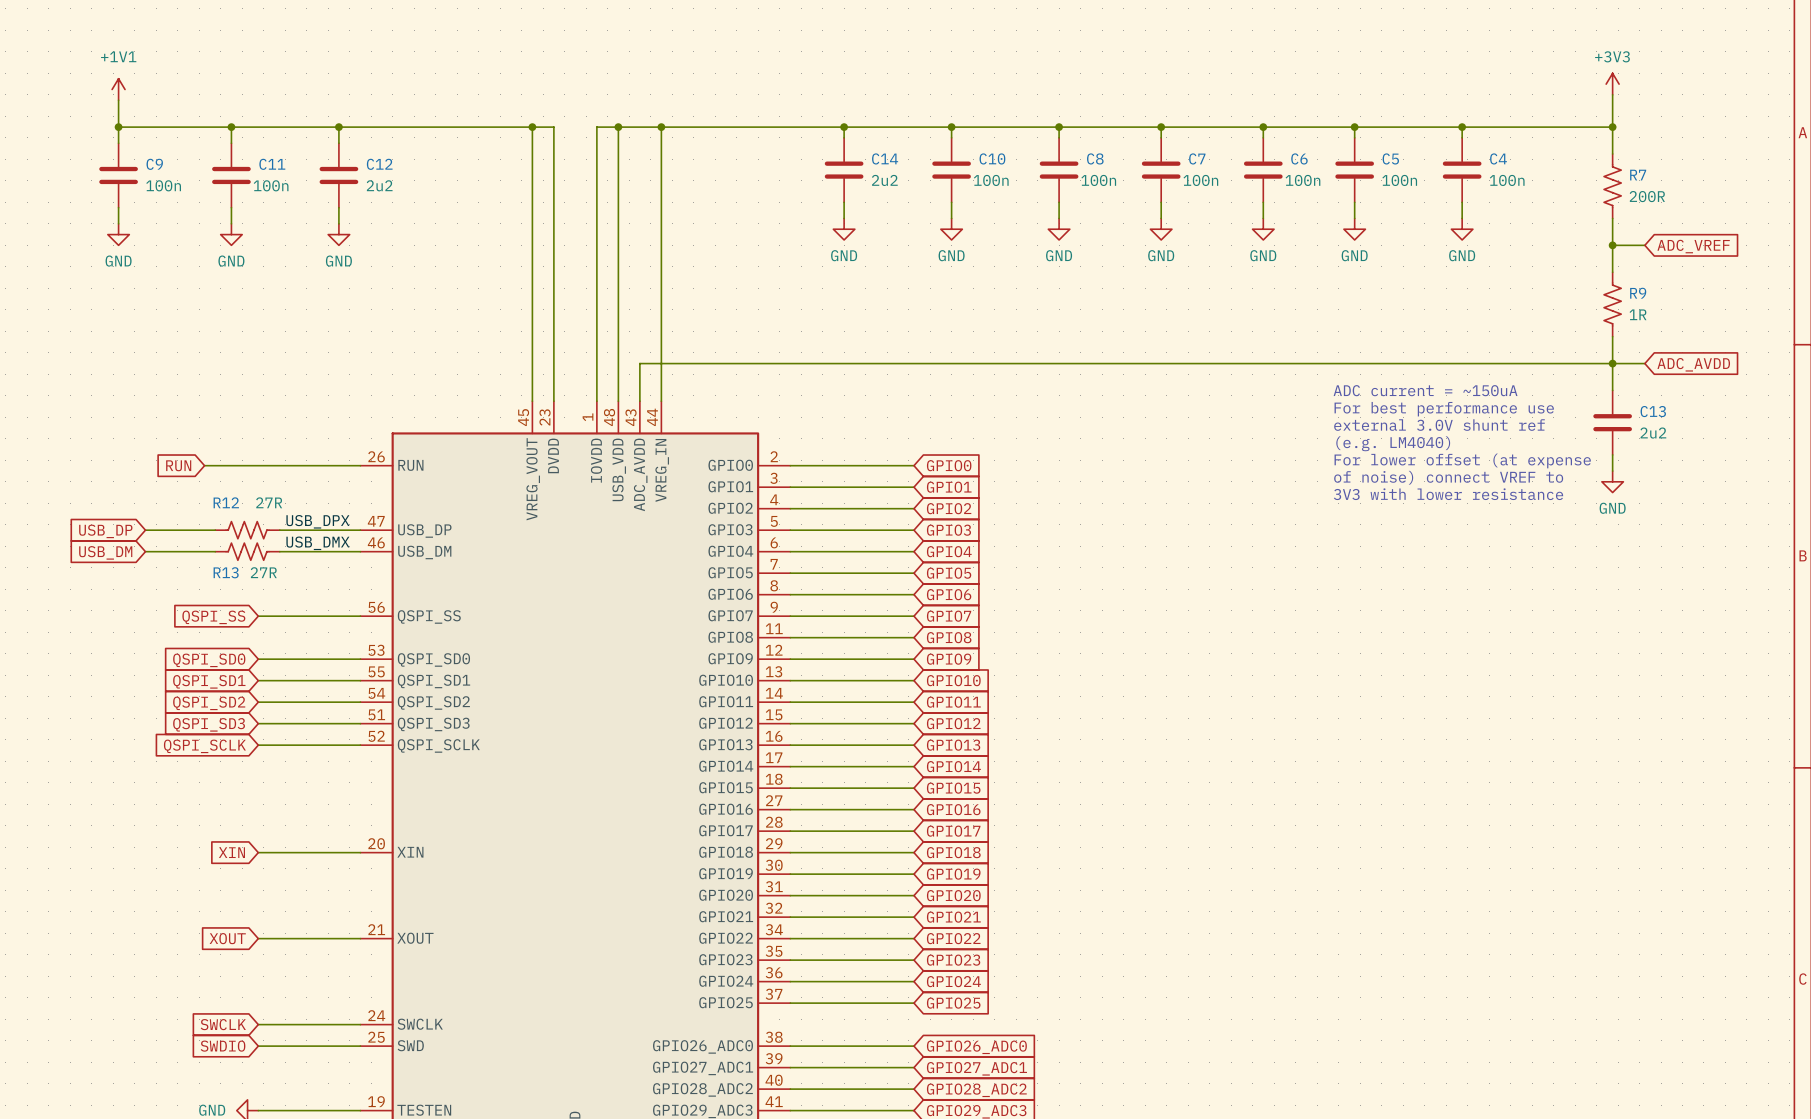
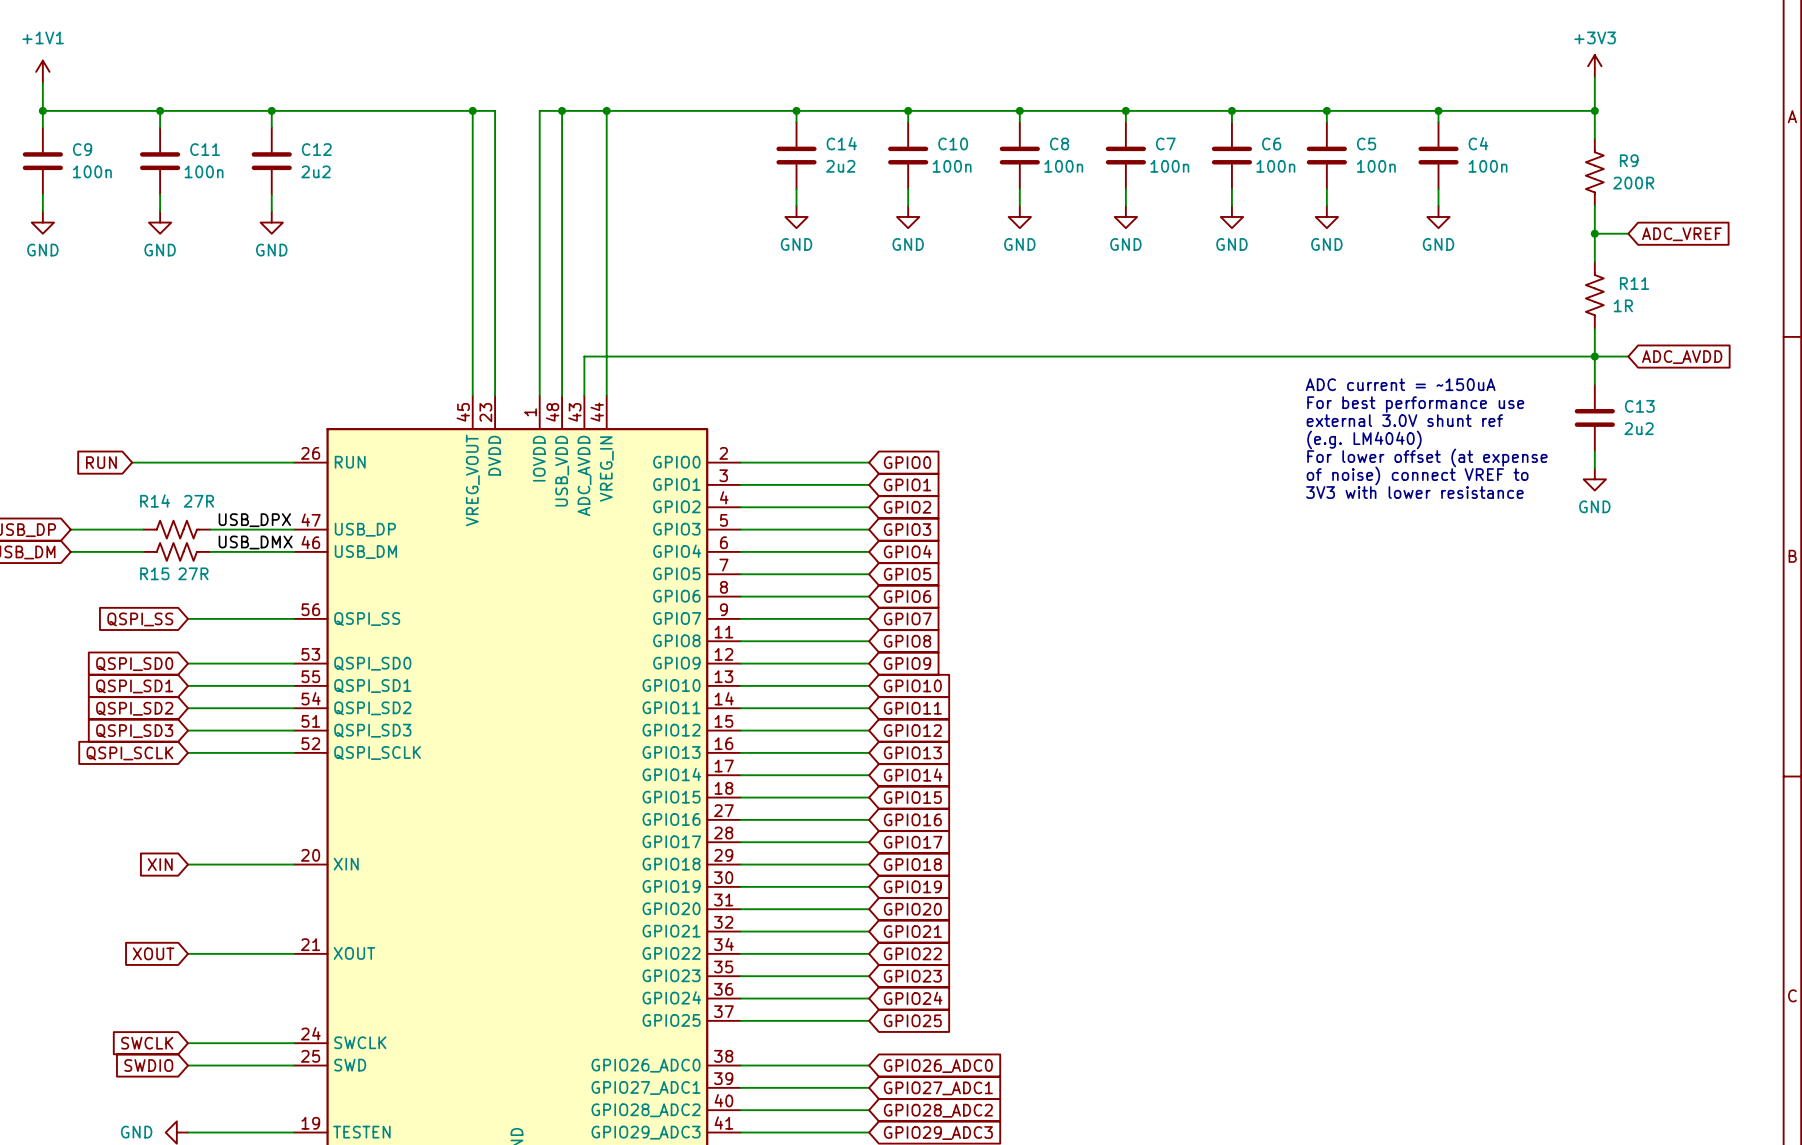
R7 name: R7 (1638, 175) -> R9 (1629, 160)
R9 name: R9 (1638, 293) -> R11 (1634, 283)
R12 name: R12 (226, 502) -> R14 (155, 501)
R13 name: R13 (226, 572) -> R15 (154, 573)

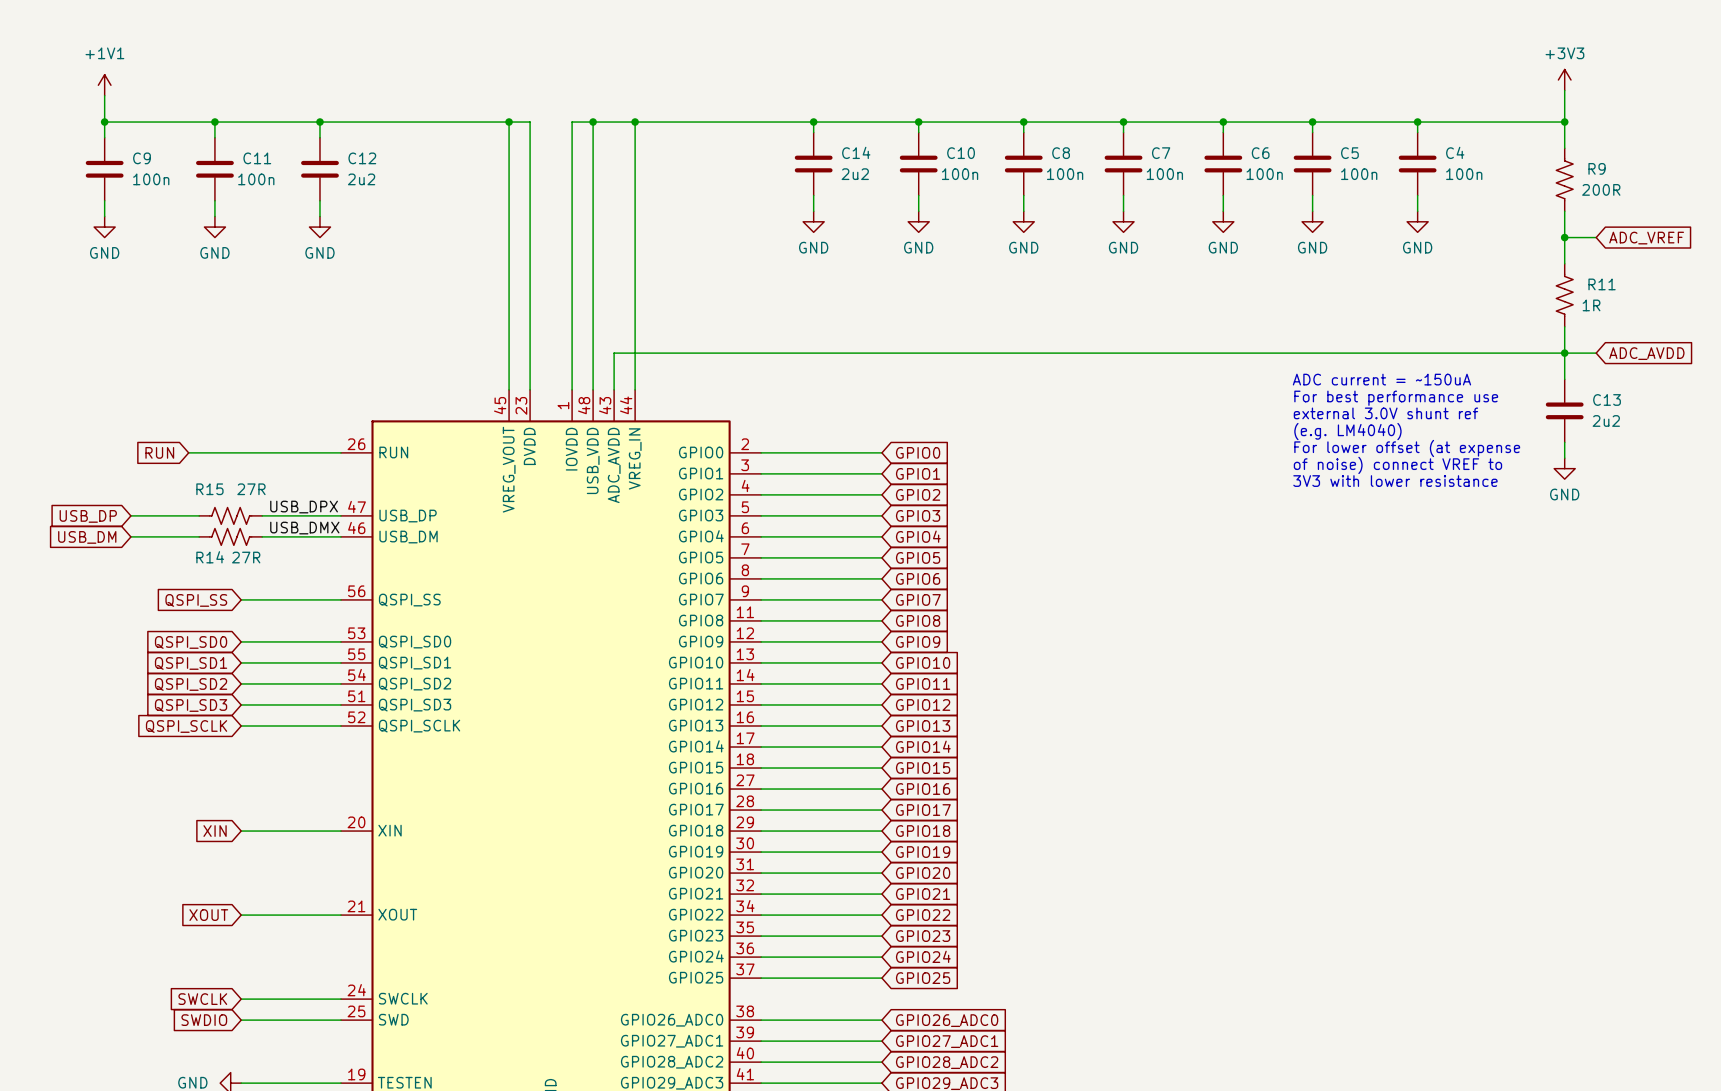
R14 name: R14 (155, 501) -> R15 (209, 489)
R15 name: R15 (154, 573) -> R14 (210, 557)

